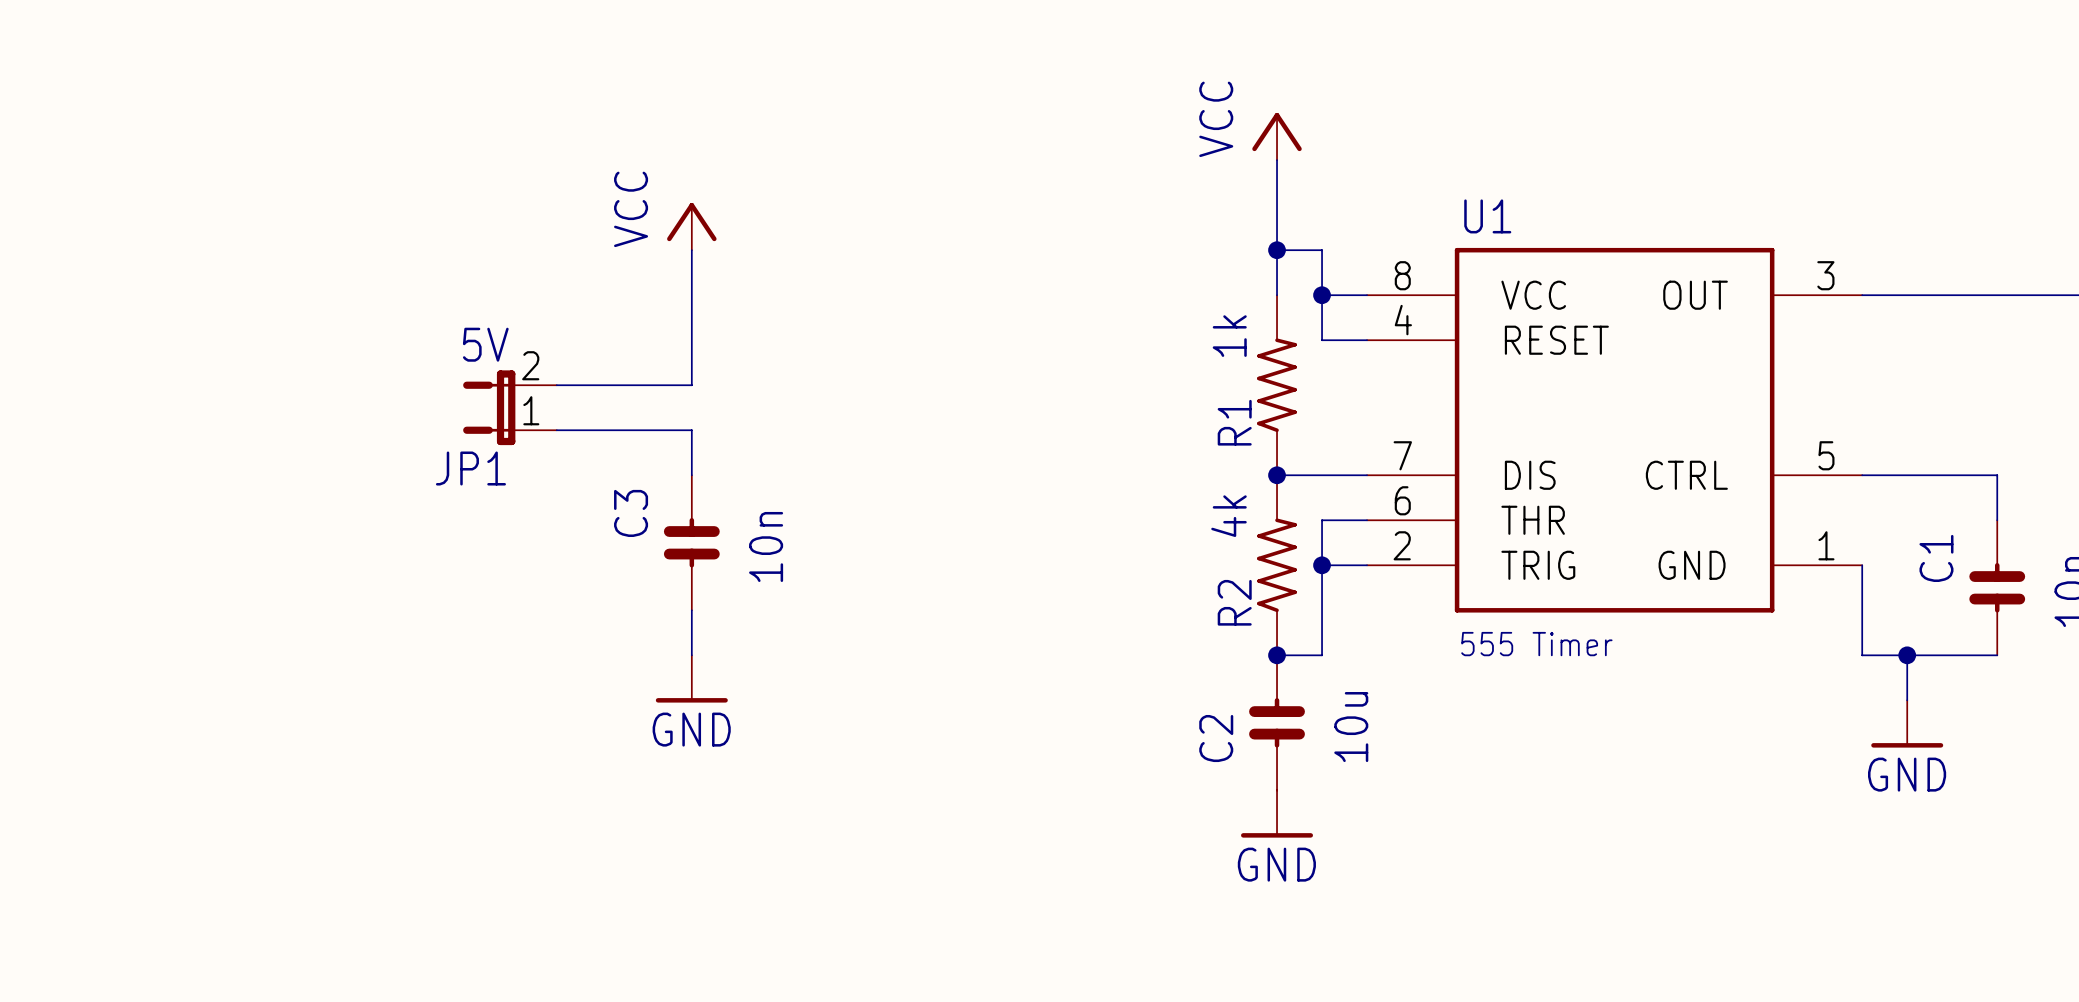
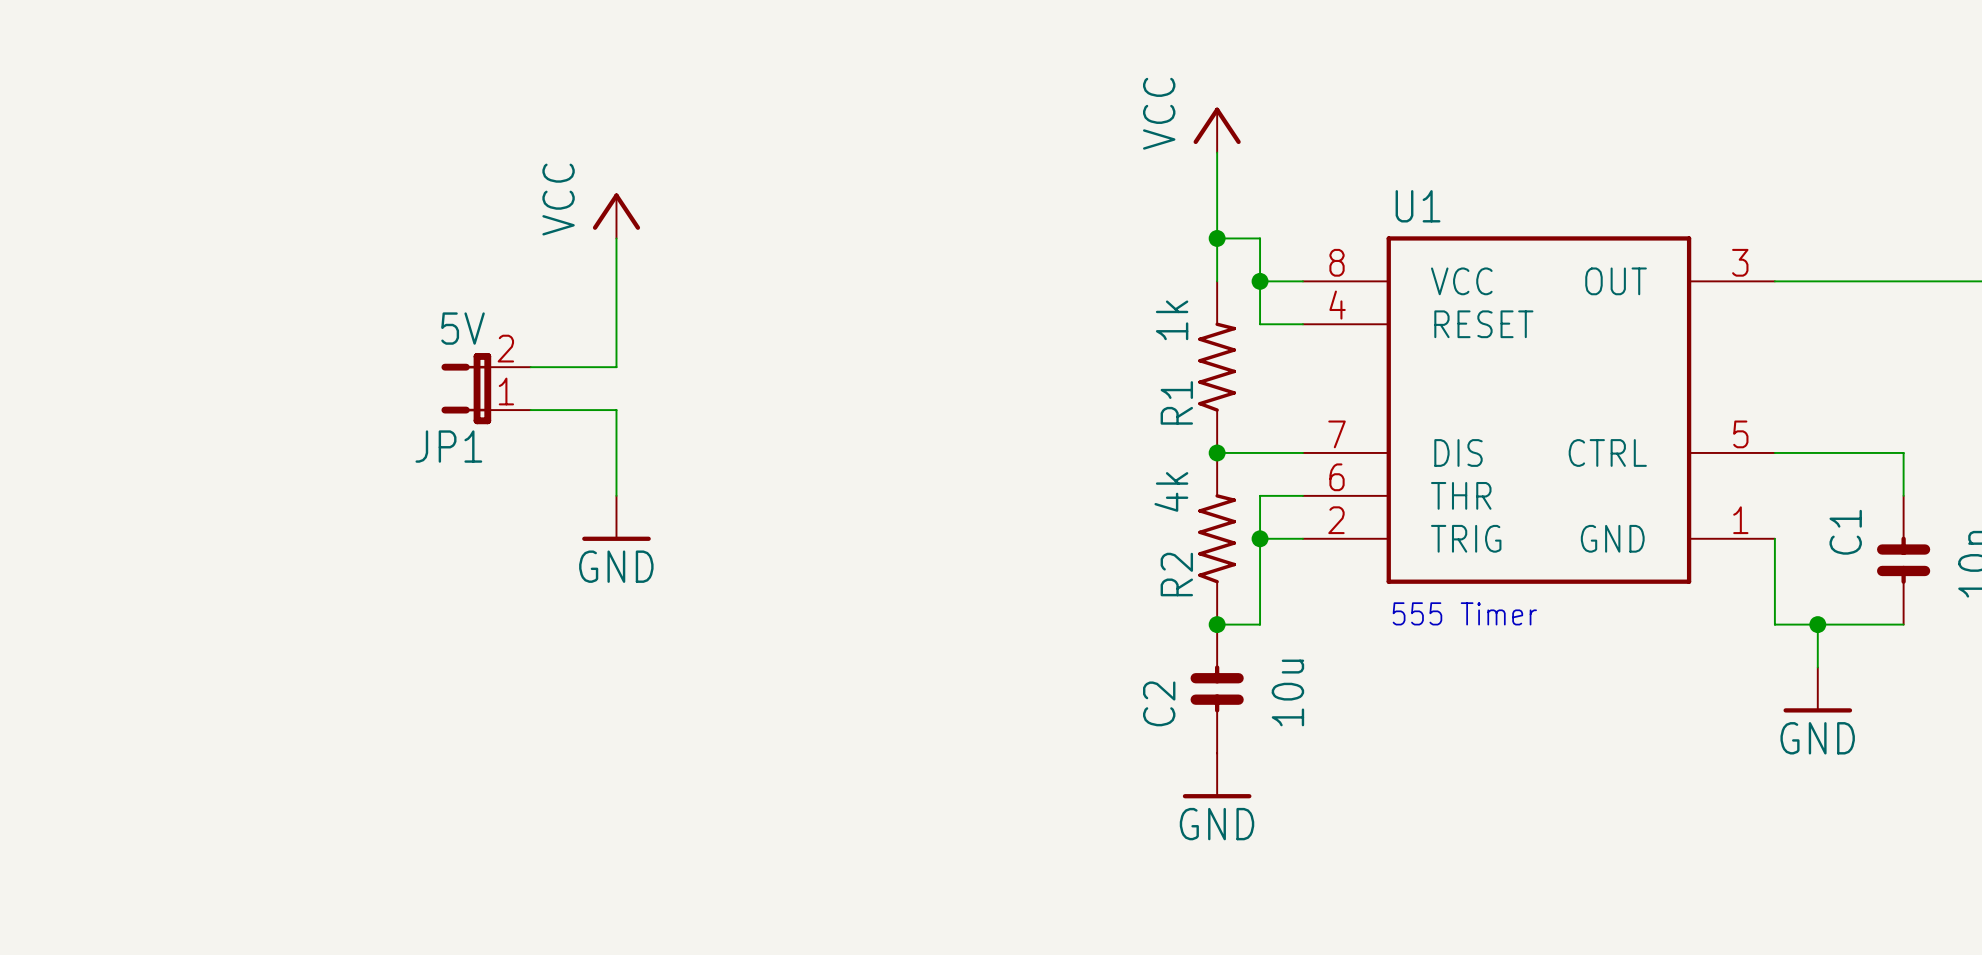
power symbol position: VCC (691, 226) -> VCC (616, 215)
wire: (691, 250) (691, 385) (646, 385) -> (616, 238) (616, 367)
wire: (646, 430) (691, 430) (691, 475) -> (616, 410) (616, 495)
C3: 10n (691, 542) -> none
wire: (691, 610) (691, 655) -> none
power symbol position: GND (691, 678) -> GND (616, 518)

